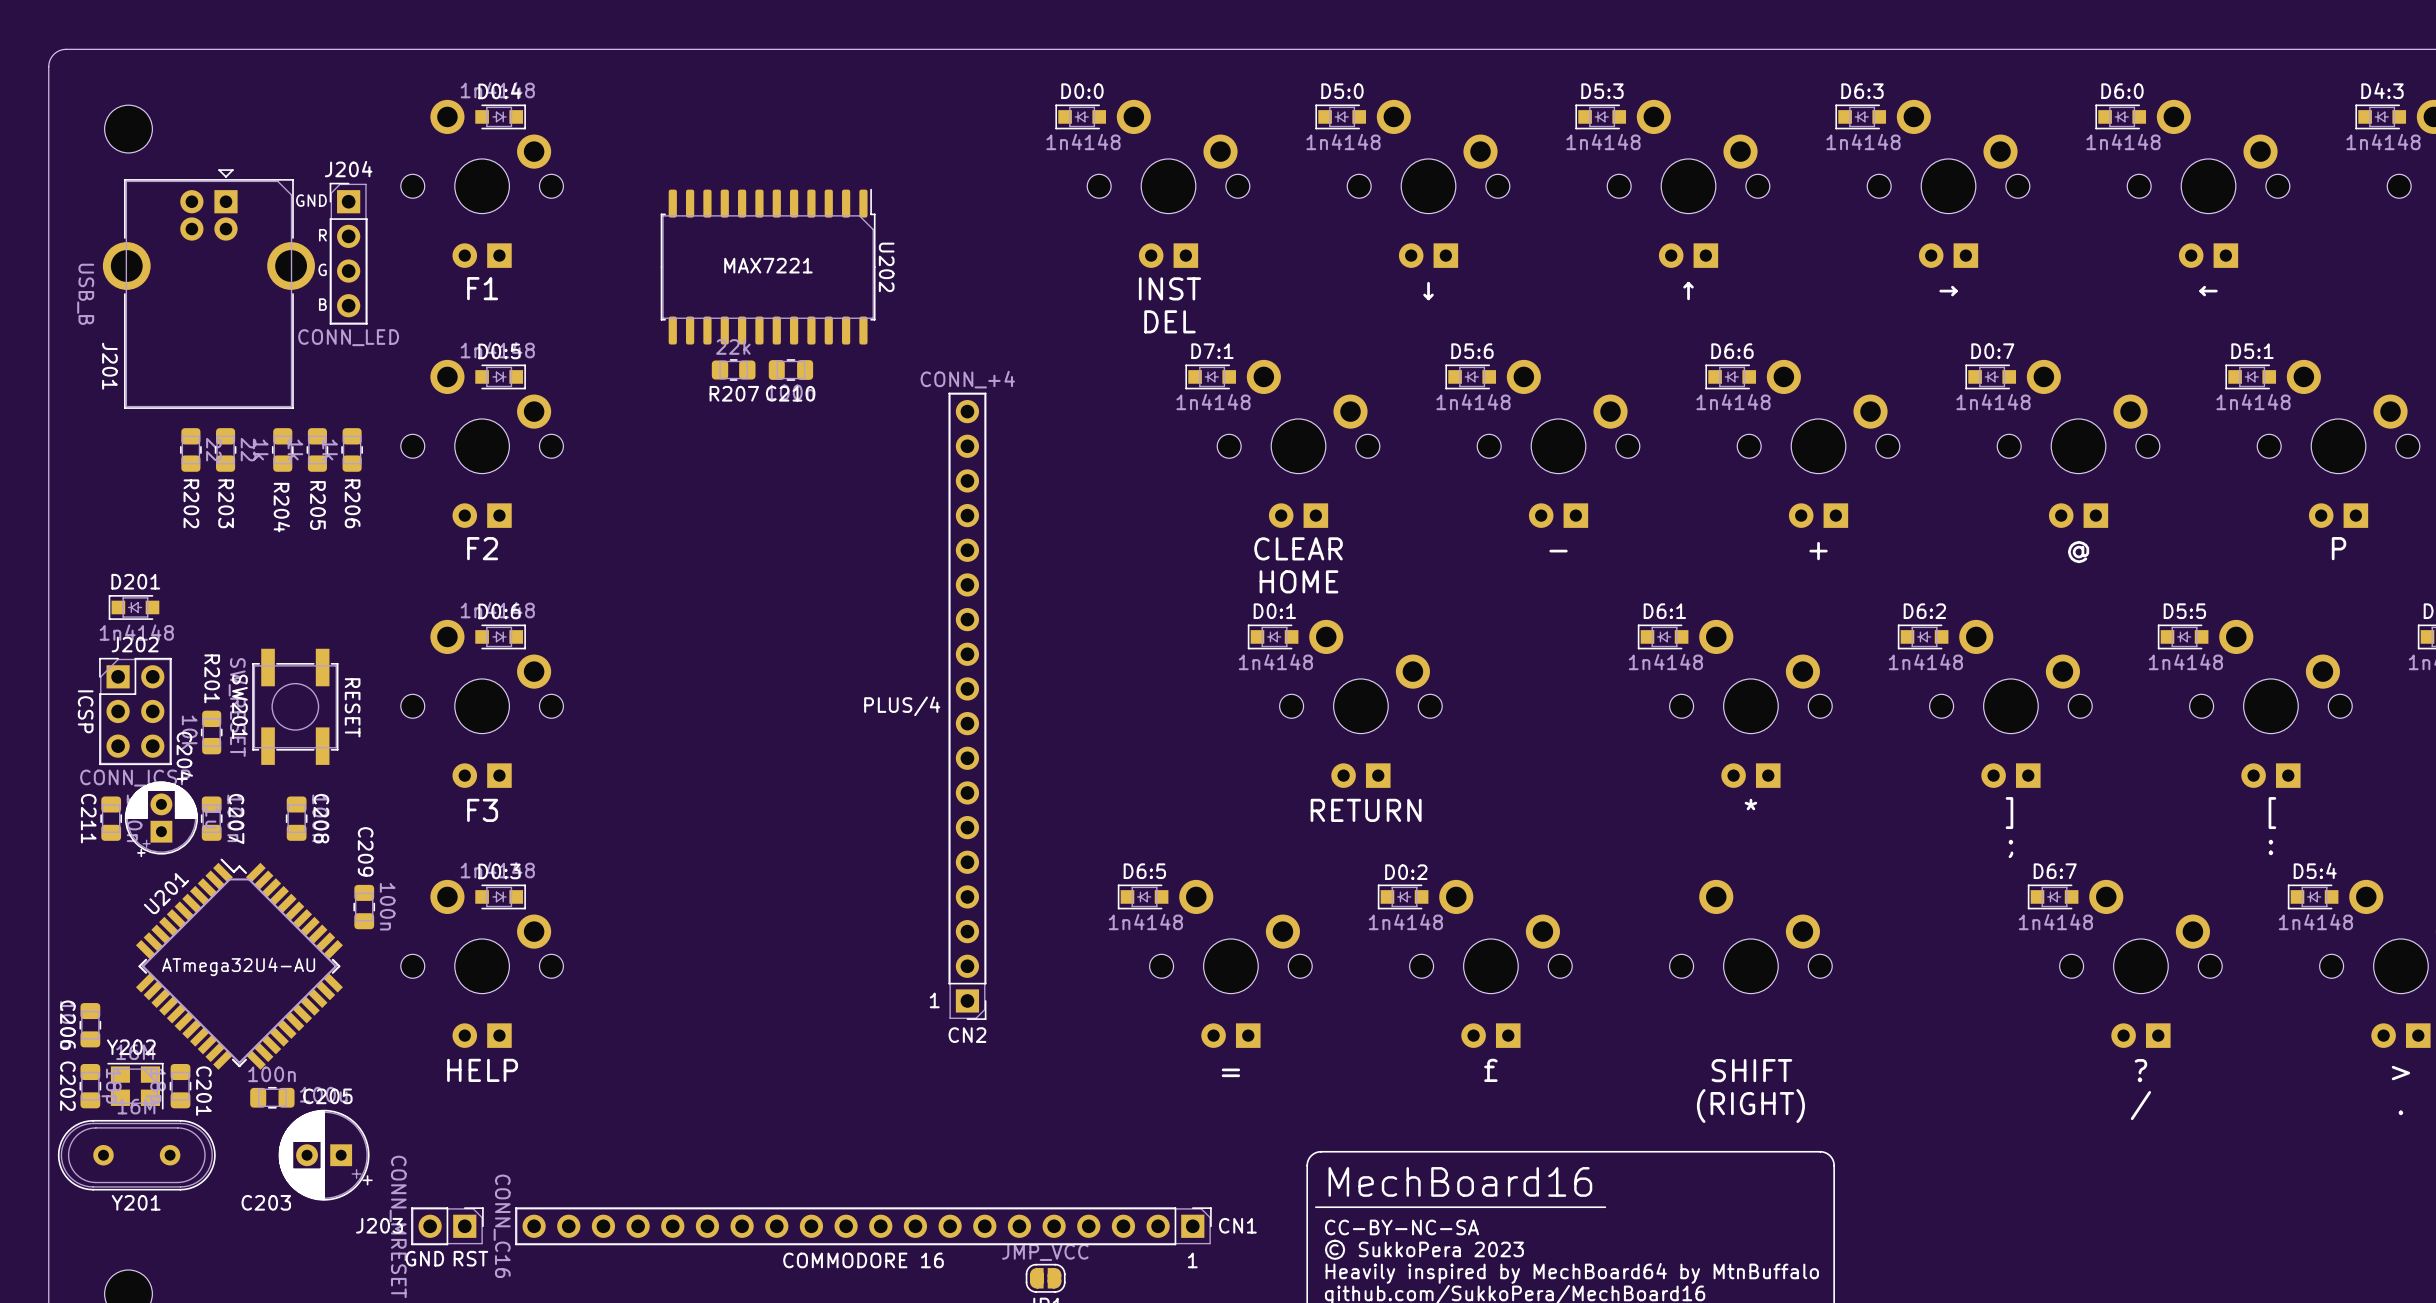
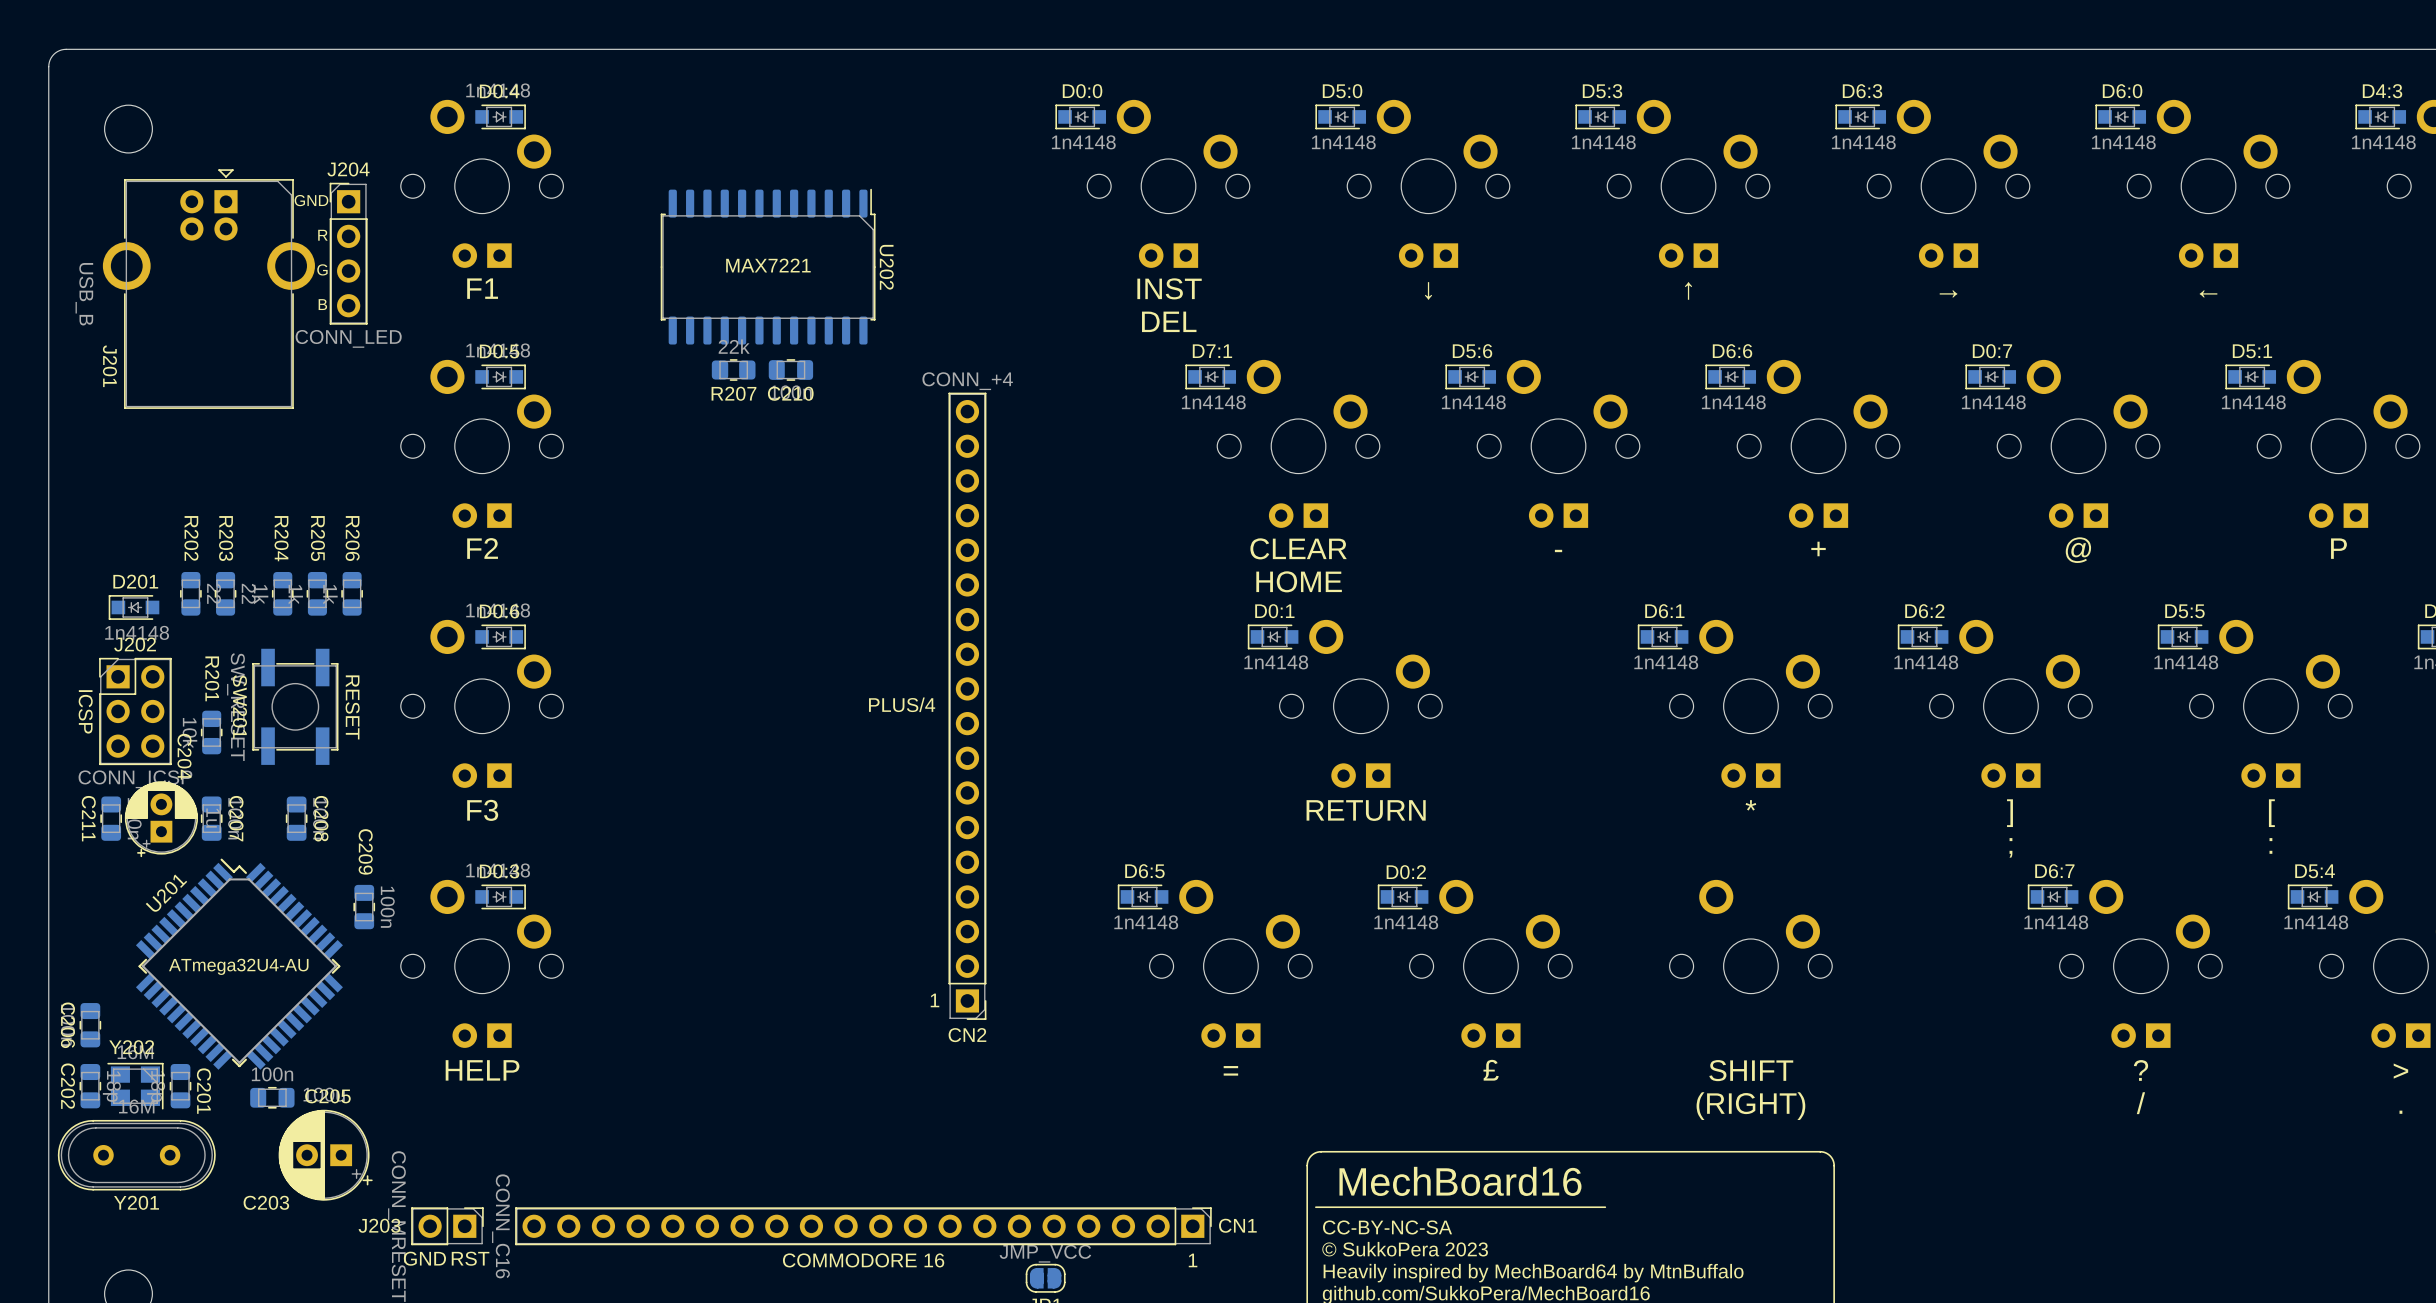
R202 position: (190, 449) -> (190, 593)
R203 position: (225, 449) -> (225, 593)
R204 position: (282, 449) -> (282, 593)
R205 position: (317, 449) -> (317, 593)
R206 position: (352, 449) -> (352, 593)
R202 name position: R202 (191, 503) -> R202 (191, 538)
R203 name position: R203 (226, 503) -> R203 (226, 538)
R206 name position: R206 (352, 503) -> R206 (352, 538)
R205 name position: R205 (317, 505) -> R205 (317, 538)
R204 name position: R204 (281, 507) -> R204 (281, 538)

